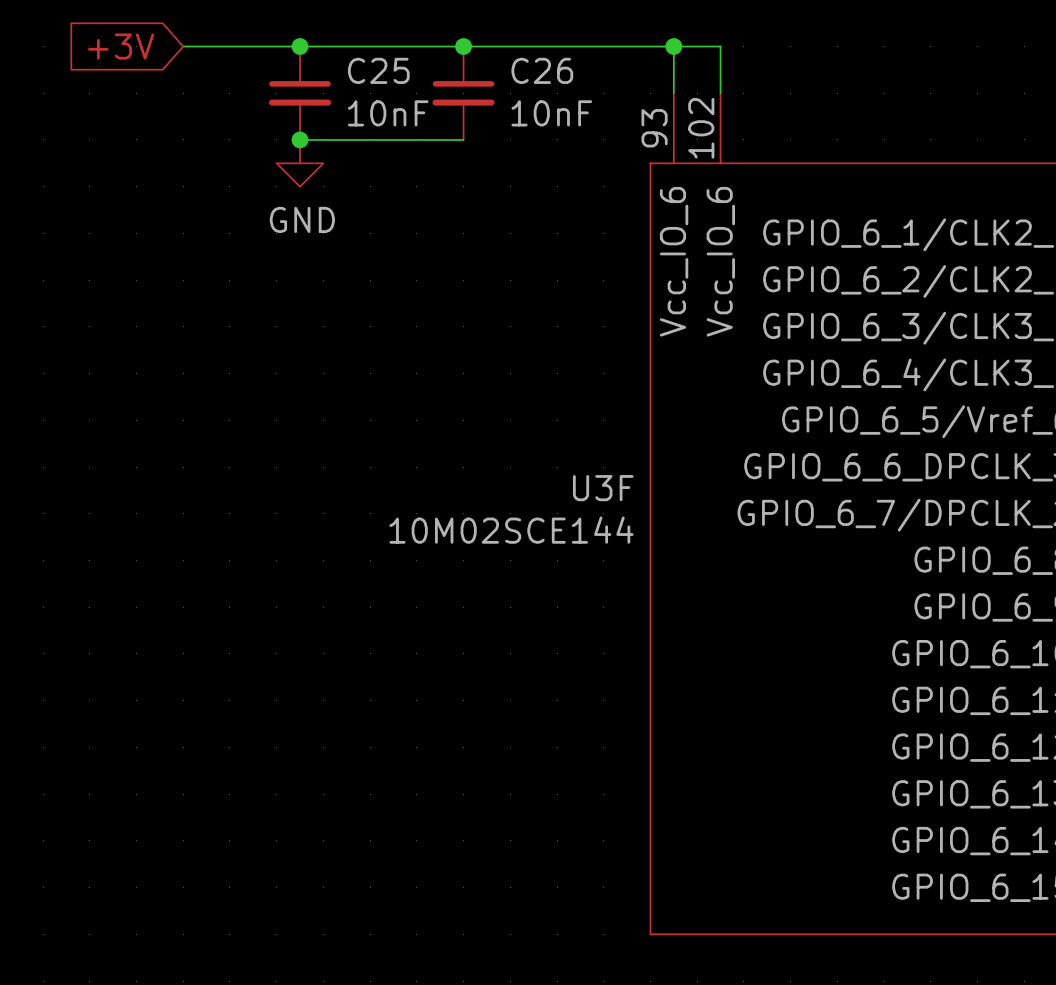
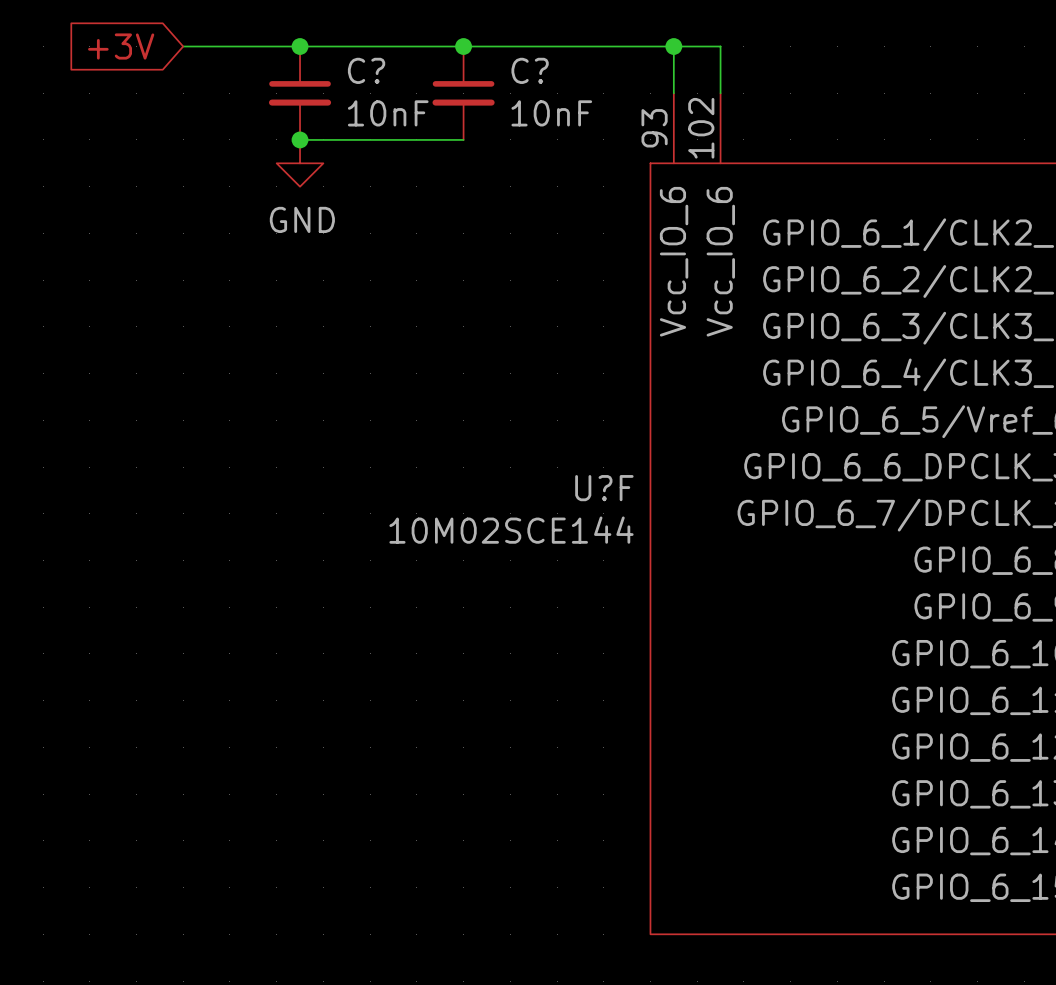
C25 name: C25 (378, 70) -> C? (366, 70)
C26 name: C26 (542, 70) -> C? (530, 70)
U3F name: U3F (603, 488) -> U?F (604, 488)

